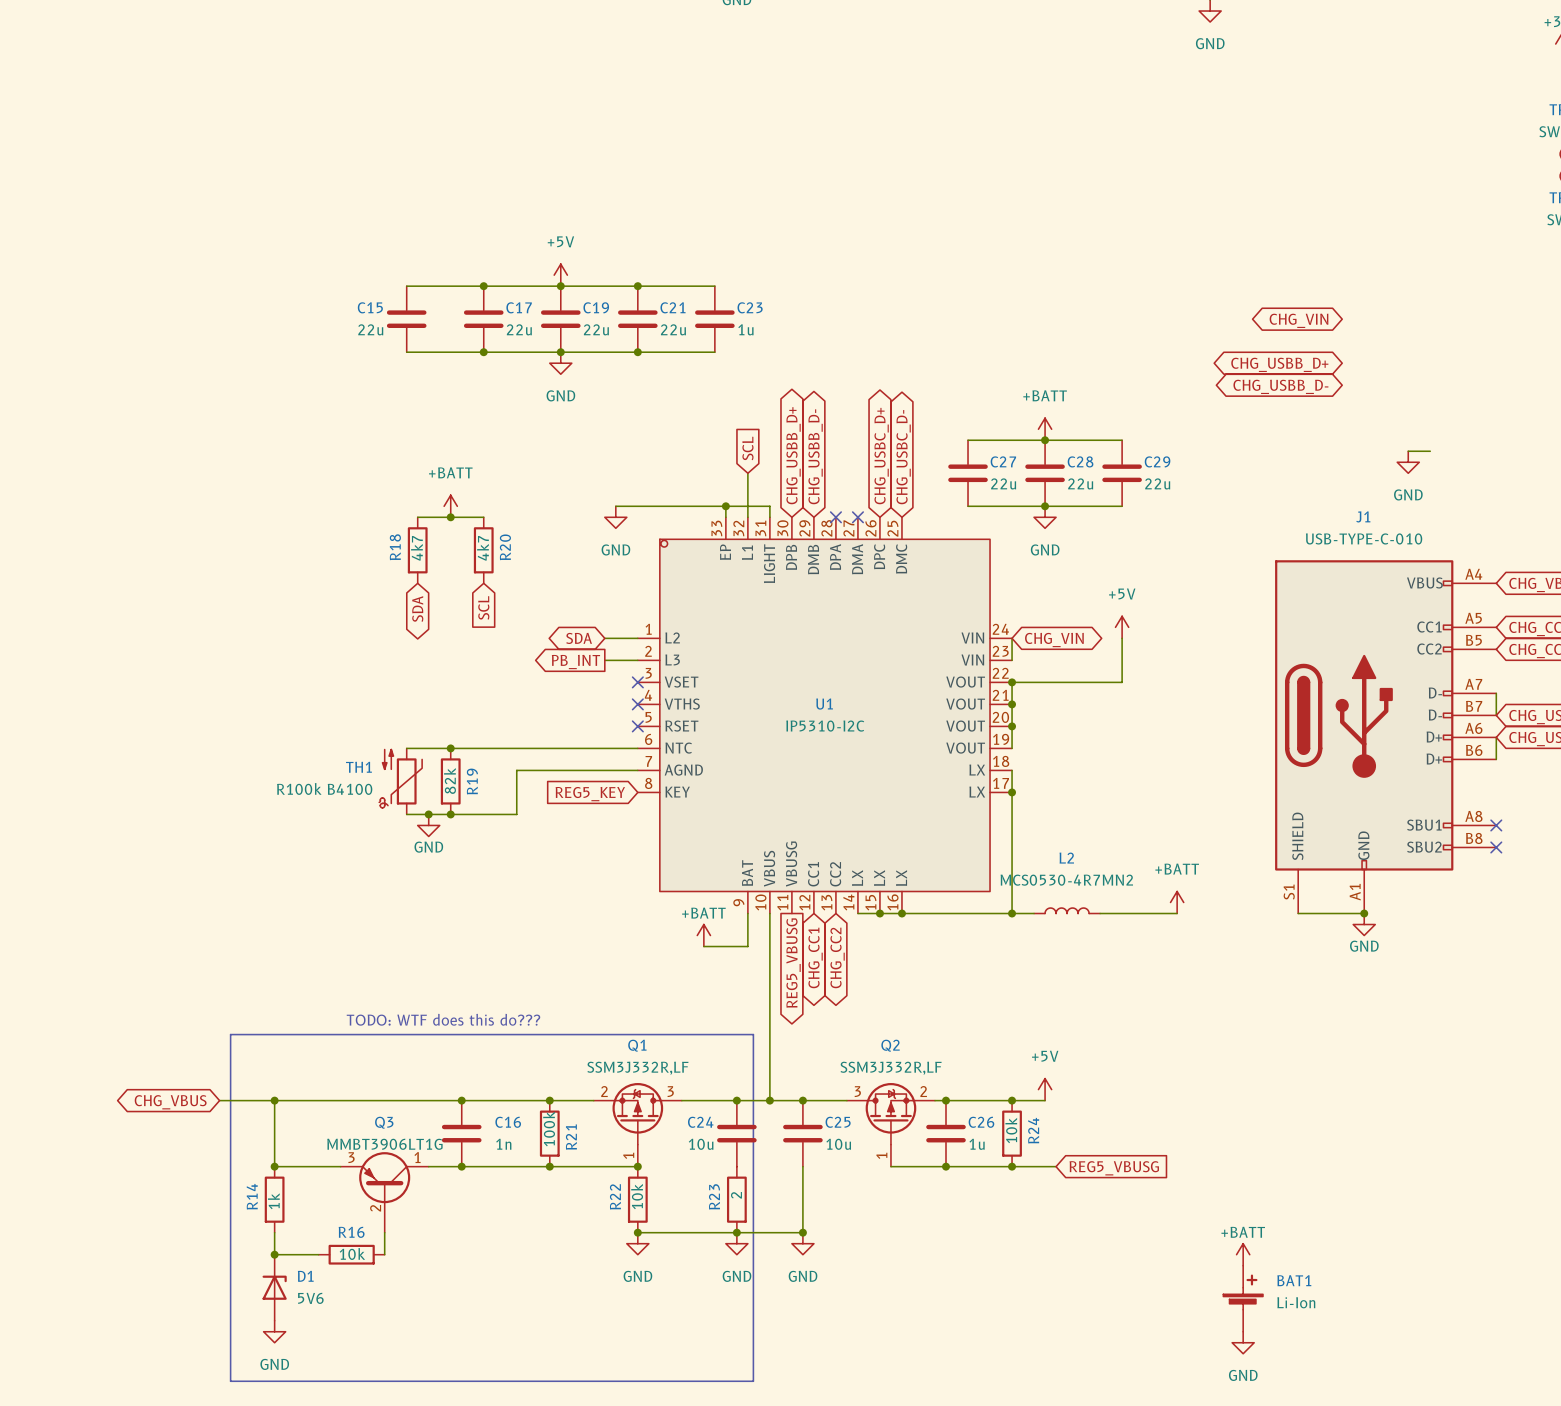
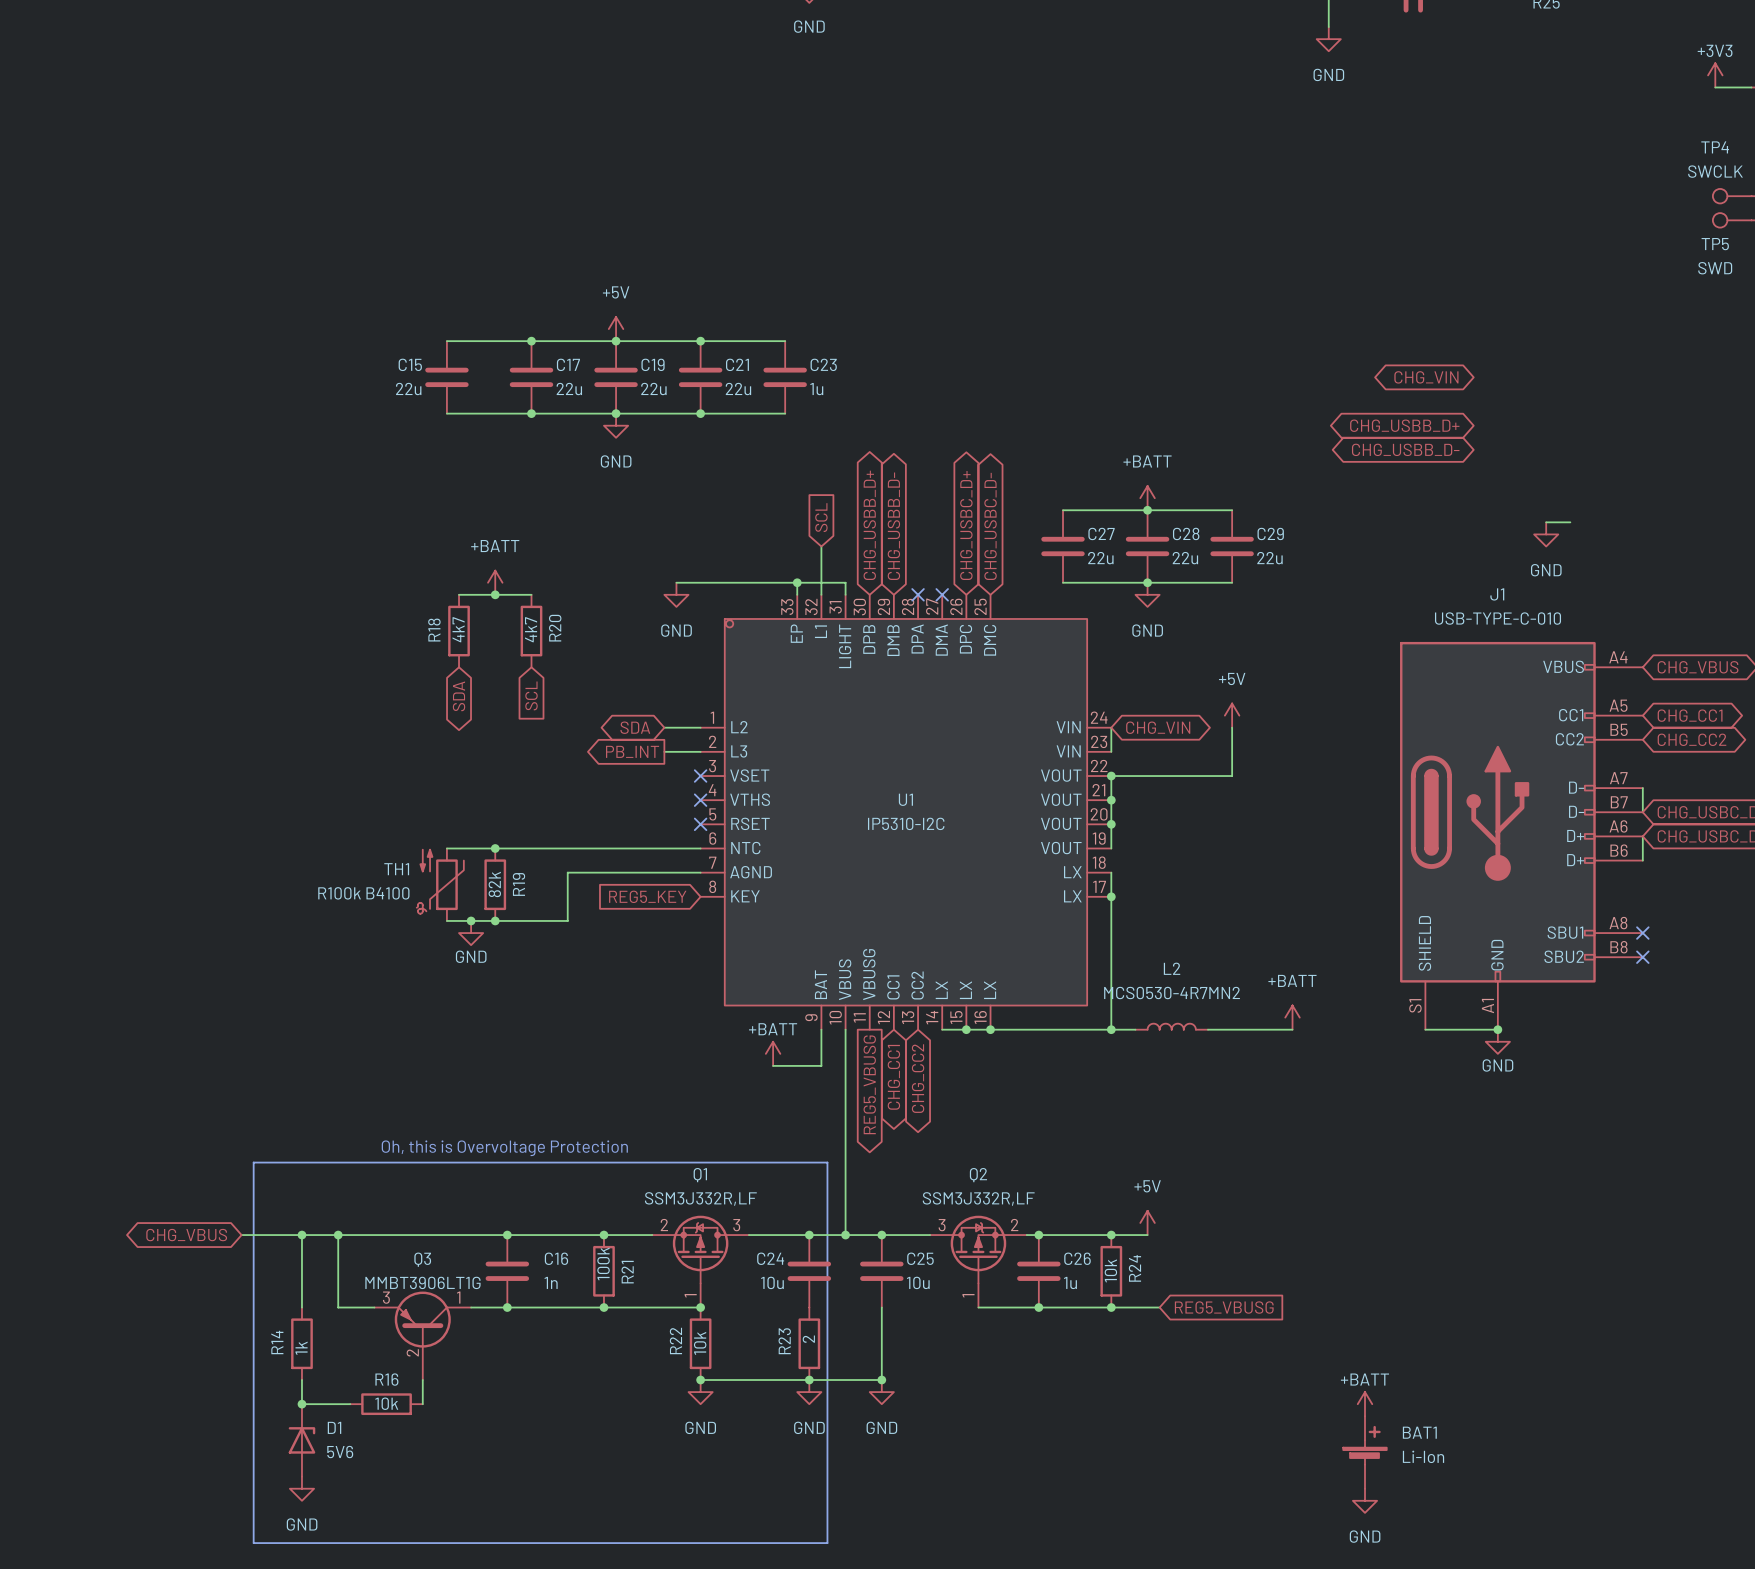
text: TODO: WTF does this do??? (443, 1019) -> Oh, this is Overvoltage Protection (504, 1148)
junction: none -> (338, 1235)
wire: (274, 1166) (307, 1166) -> (338, 1235) (338, 1307)
junction: (274, 1166) -> none

